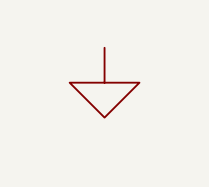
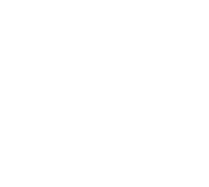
power symbol: (104, 82) -> none

